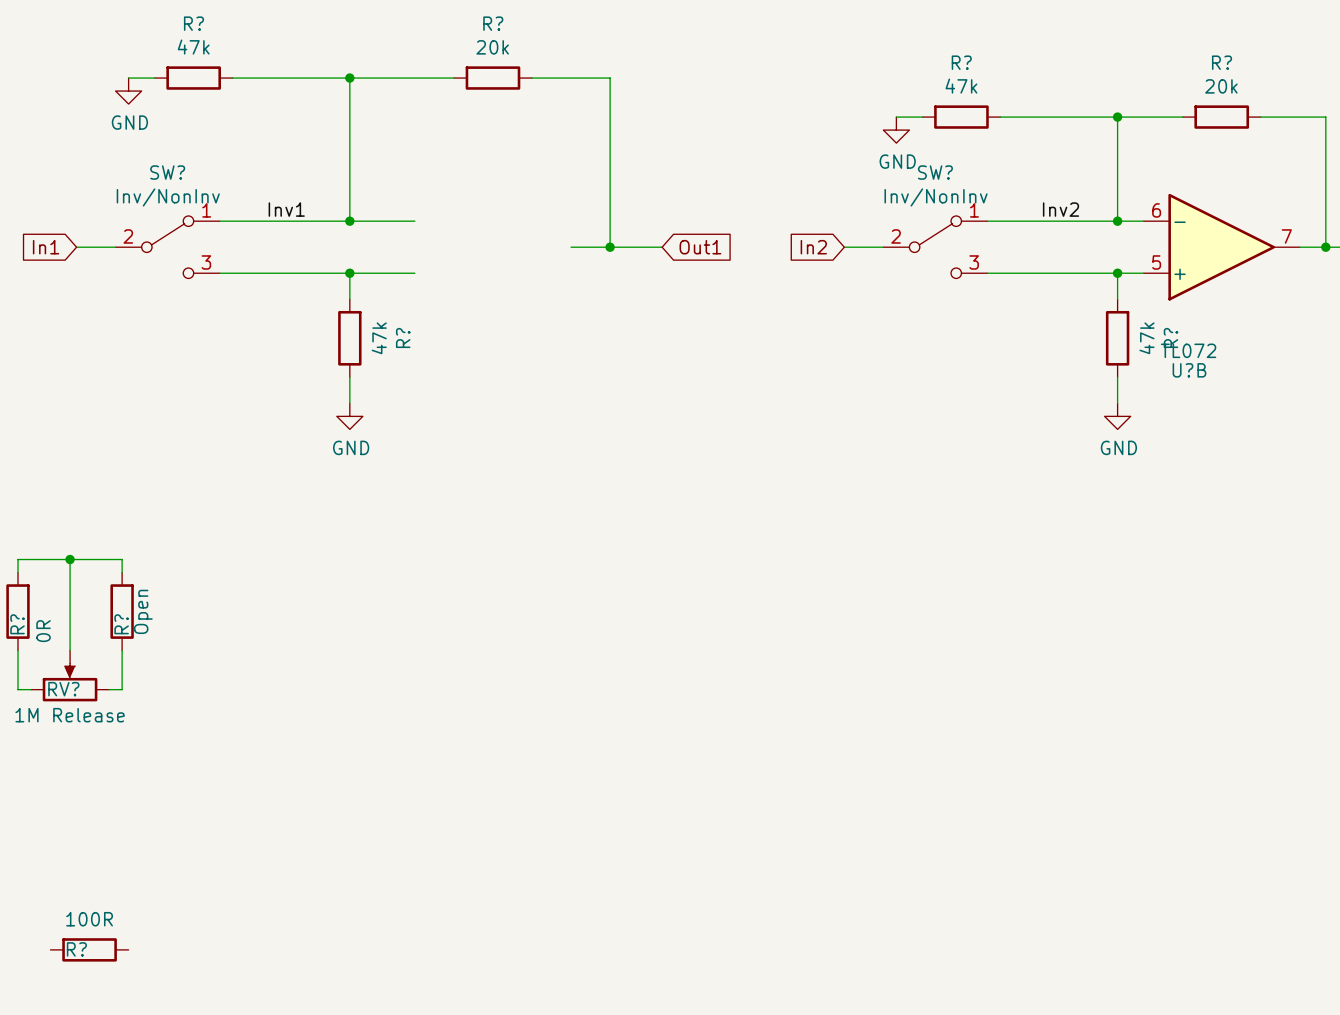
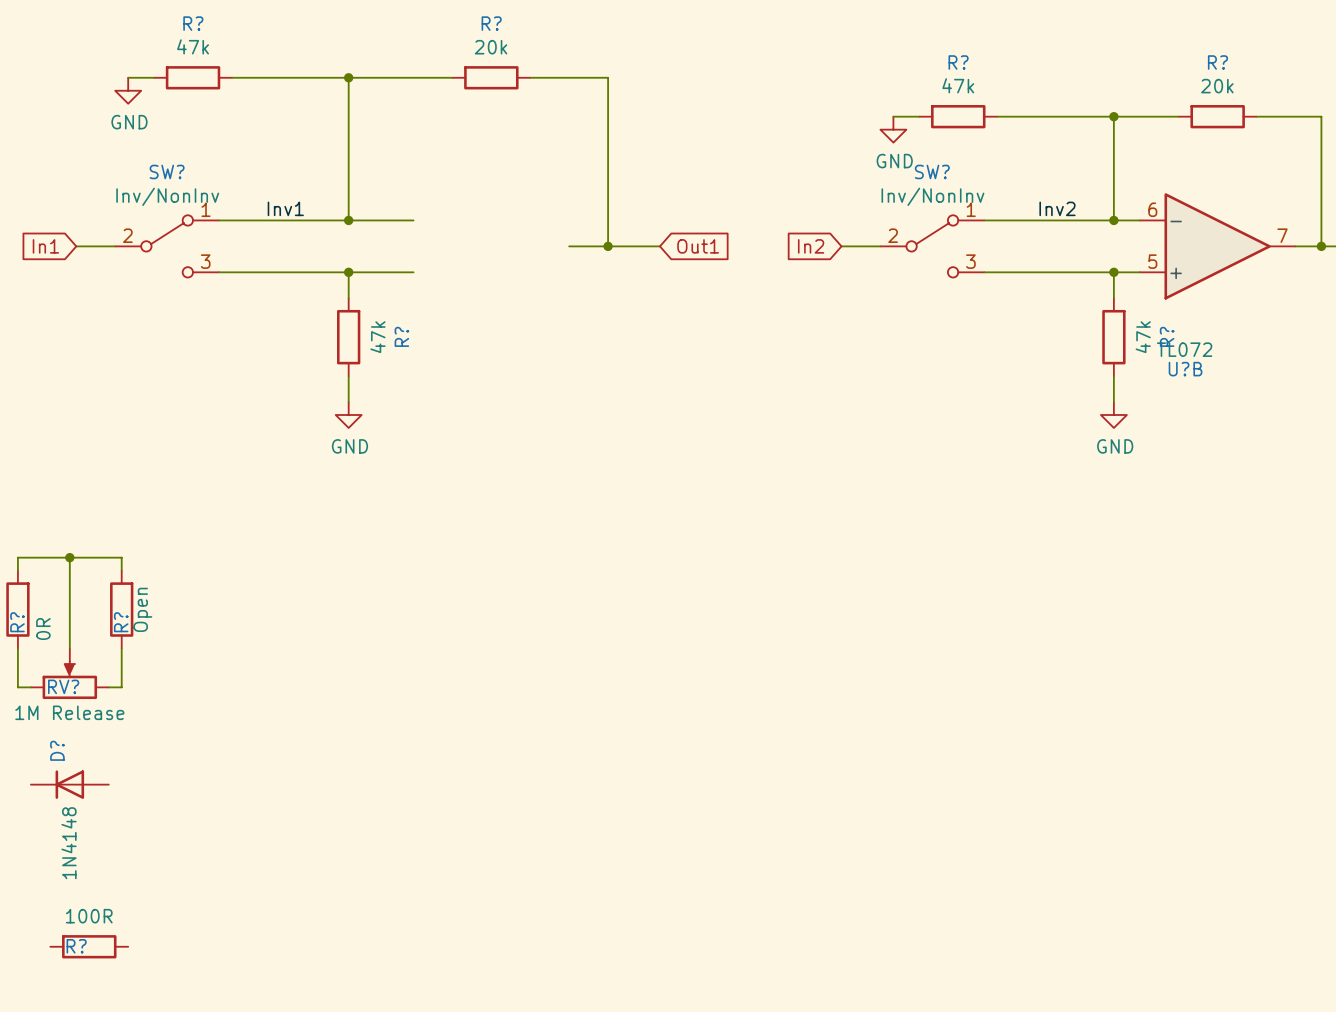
D?: none -> 1N4148 (69, 784)

